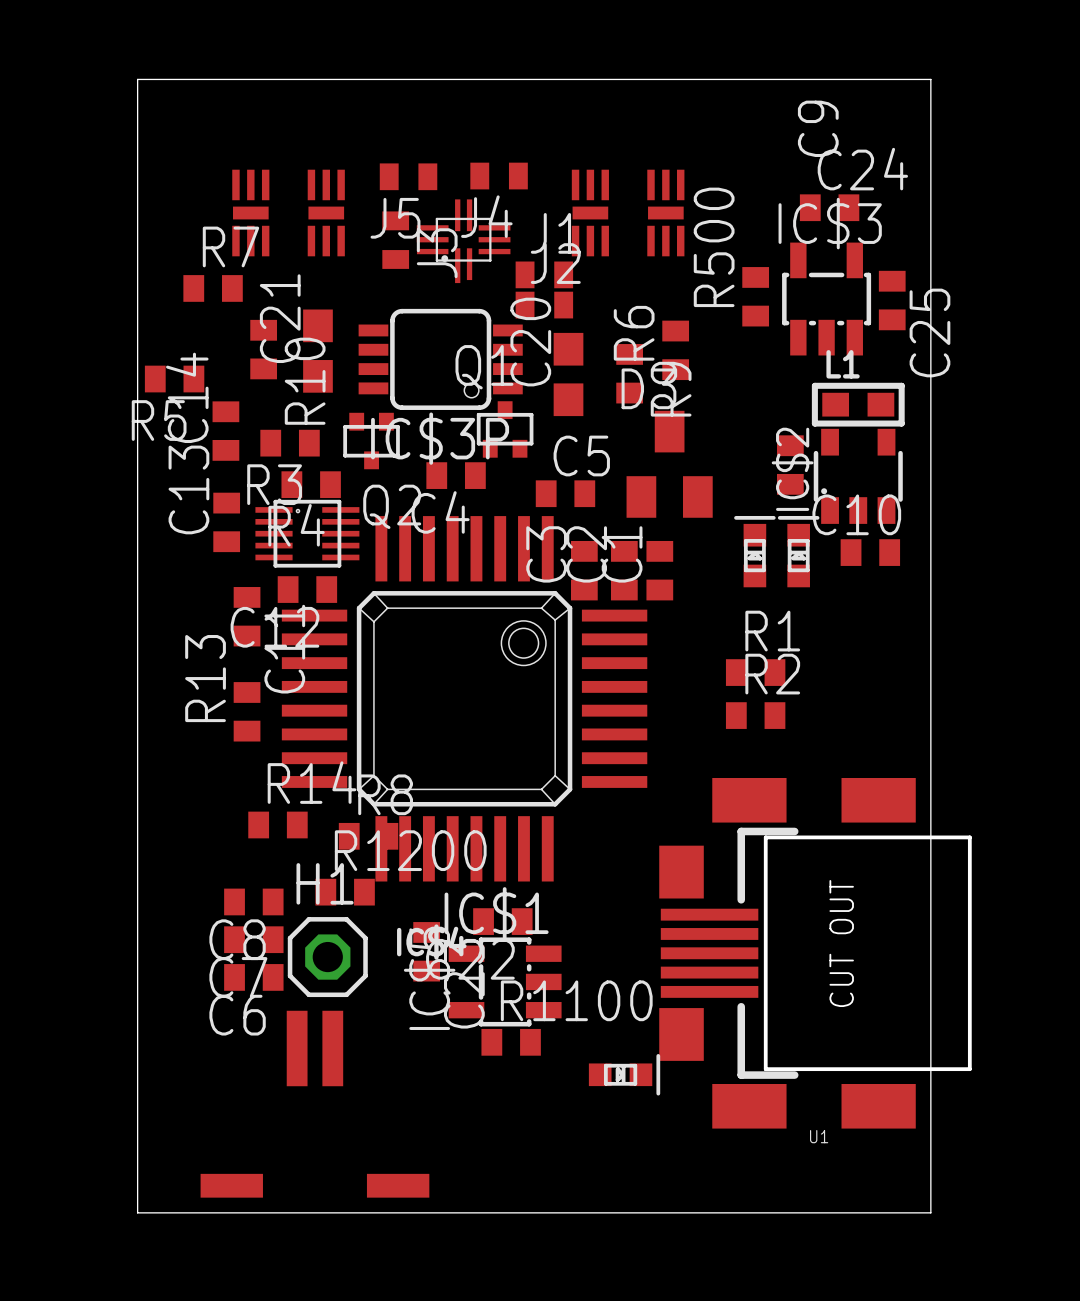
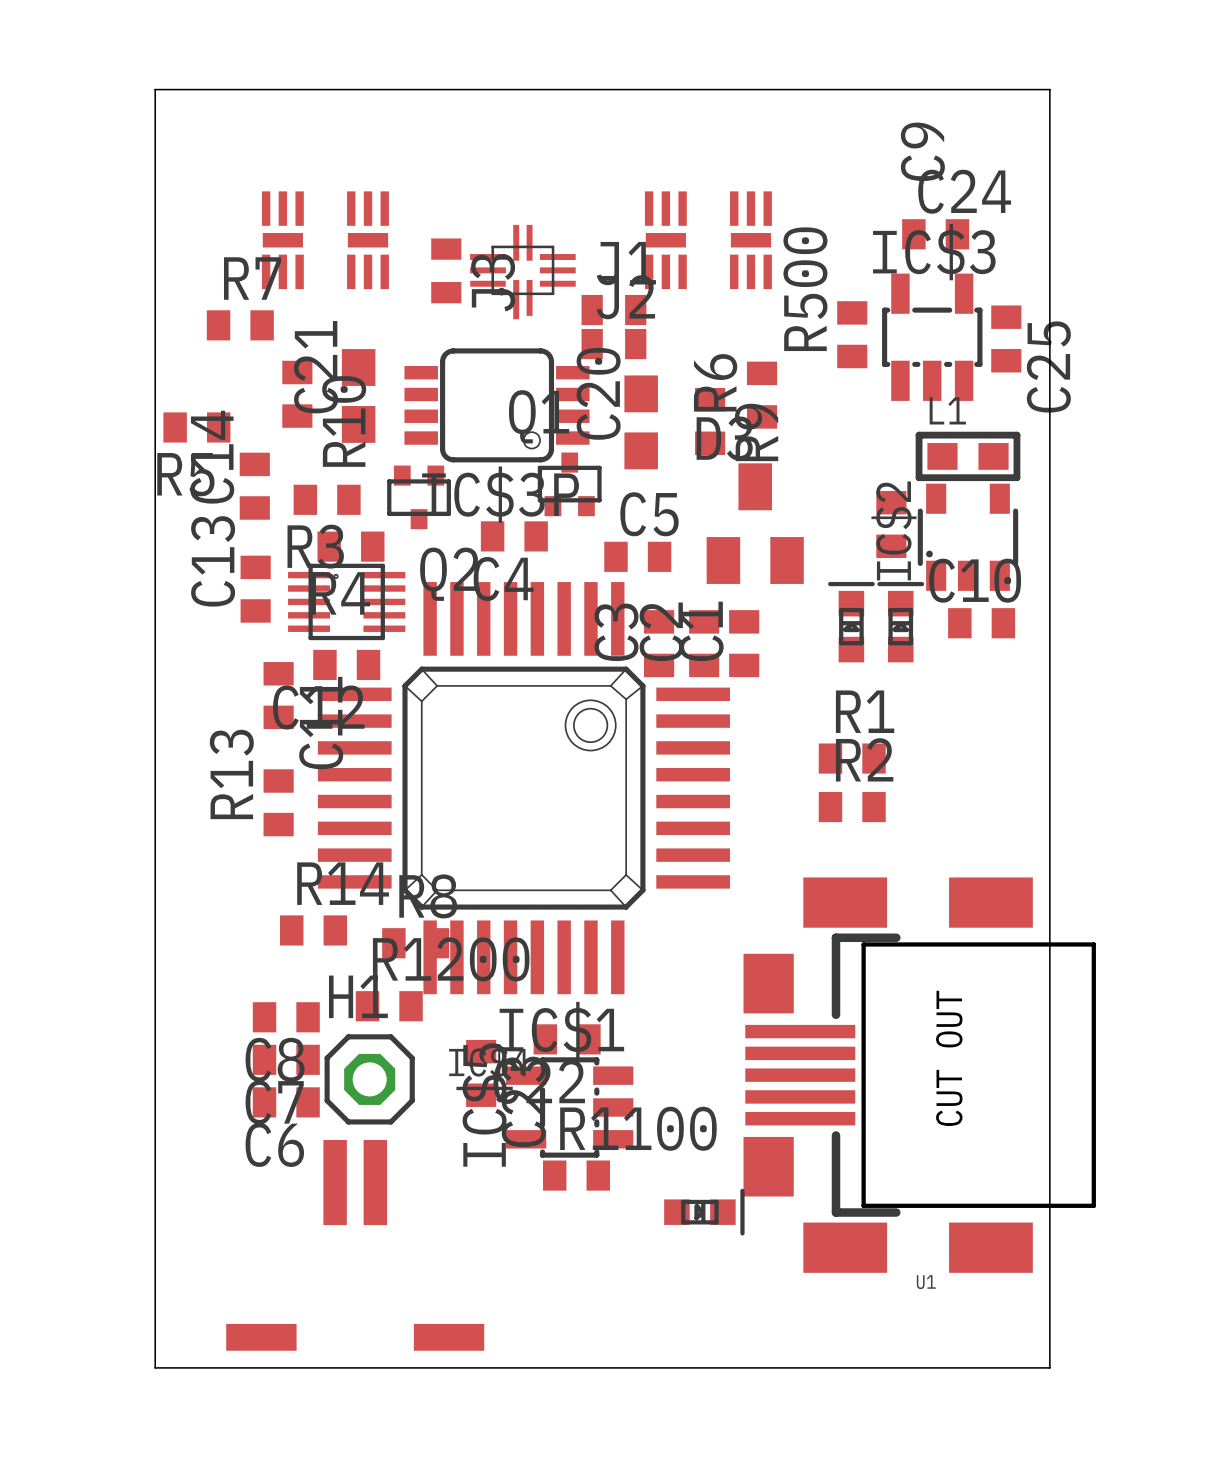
J5: (408, 176) -> none
J4: (499, 176) -> none

